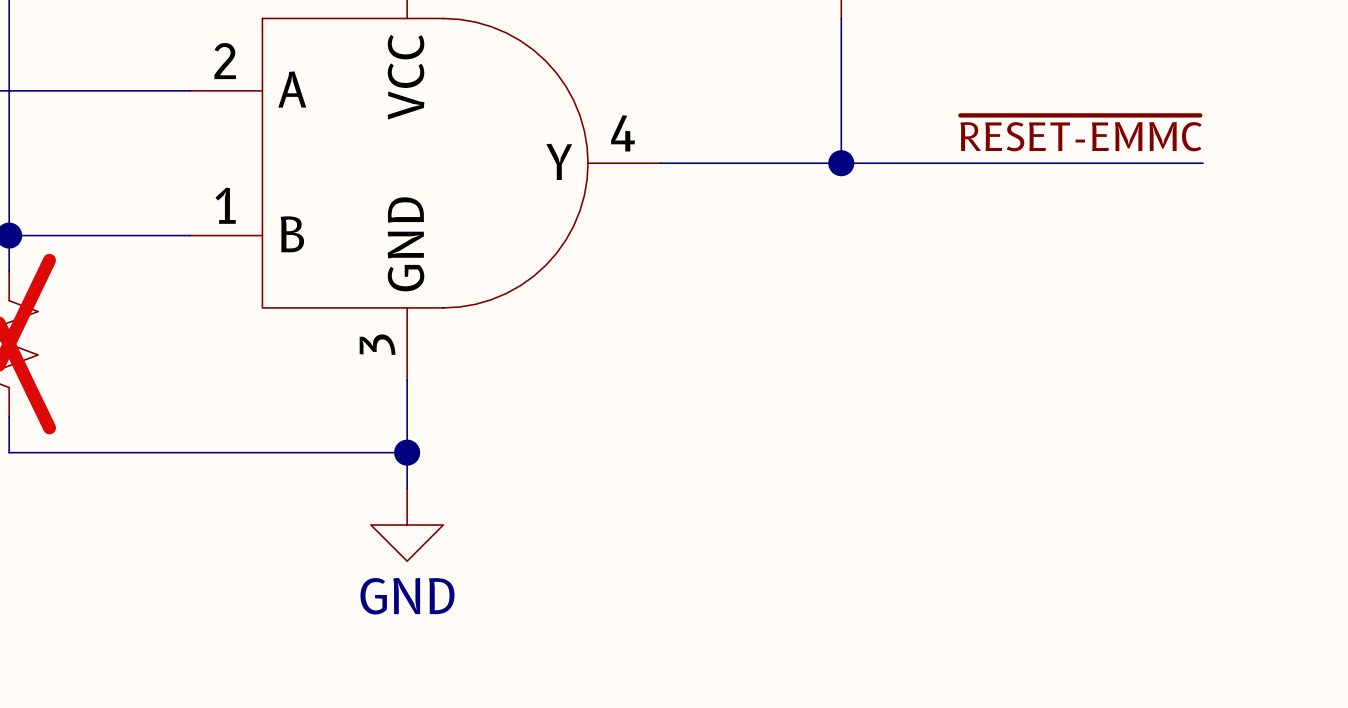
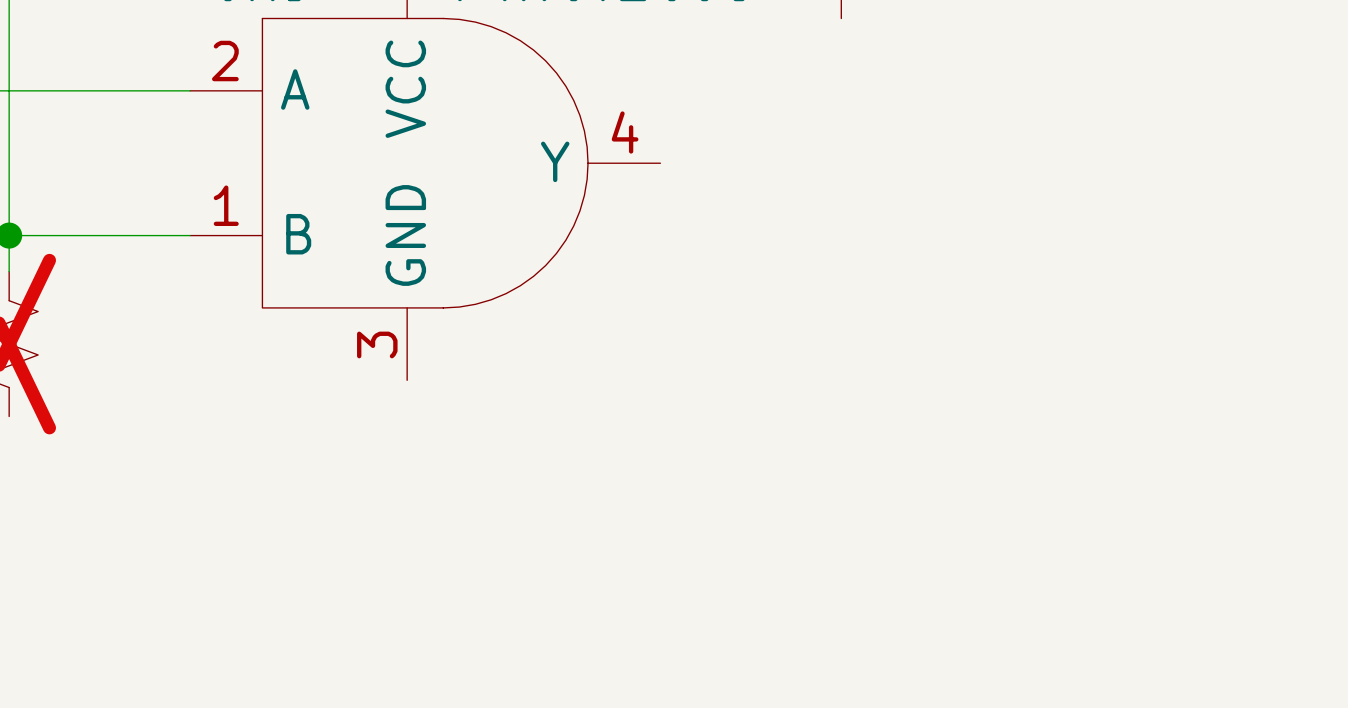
wire: (841, 18) (841, 163) -> none
label: ~{RESET-EMMC} (1081, 133) -> none
wire: (660, 163) (1203, 163) -> none
junction: (841, 163) -> none
wire: (407, 380) (407, 488) -> none
wire: (9, 416) (9, 452) (407, 452) -> none
junction: (407, 452) -> none
power symbol: GND (407, 525) -> none

